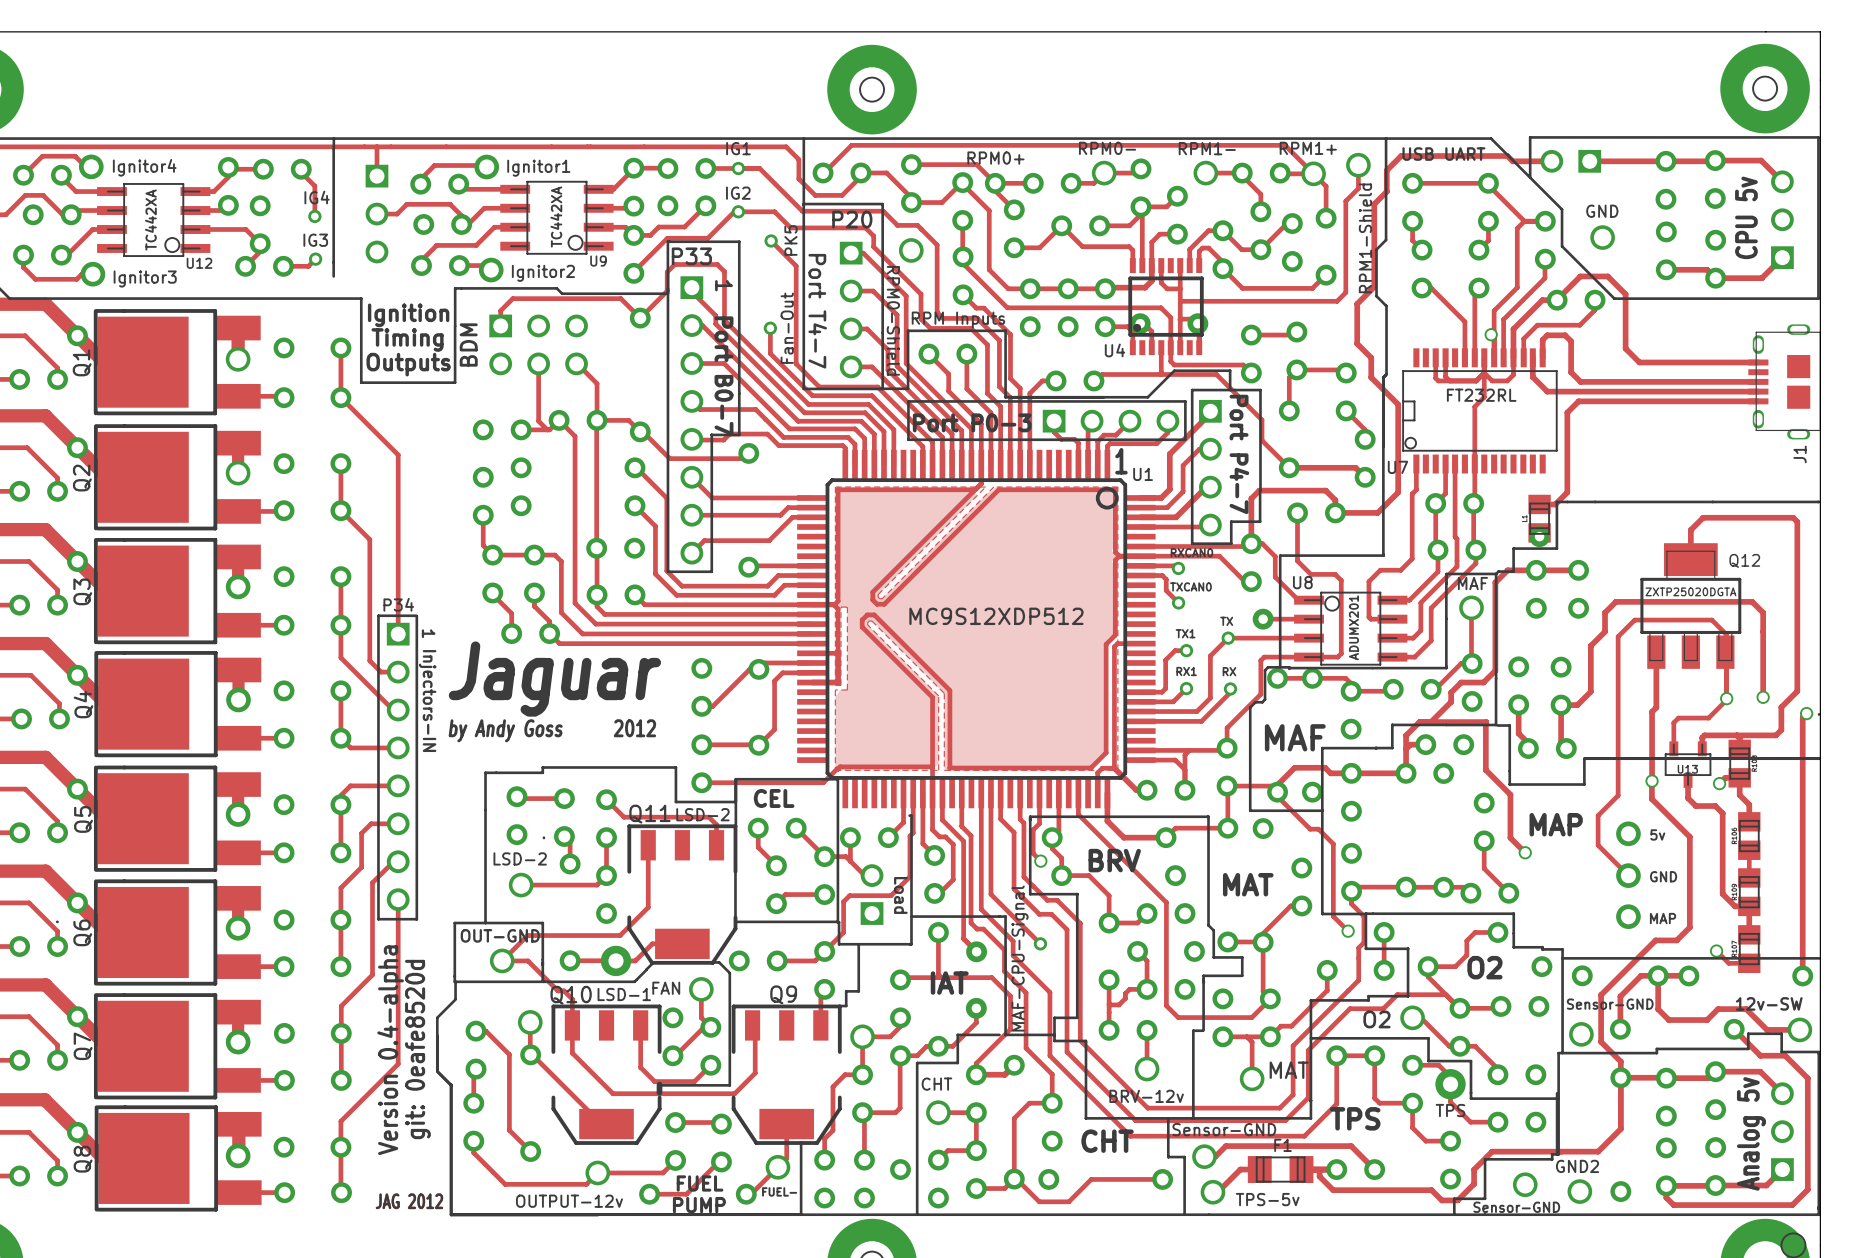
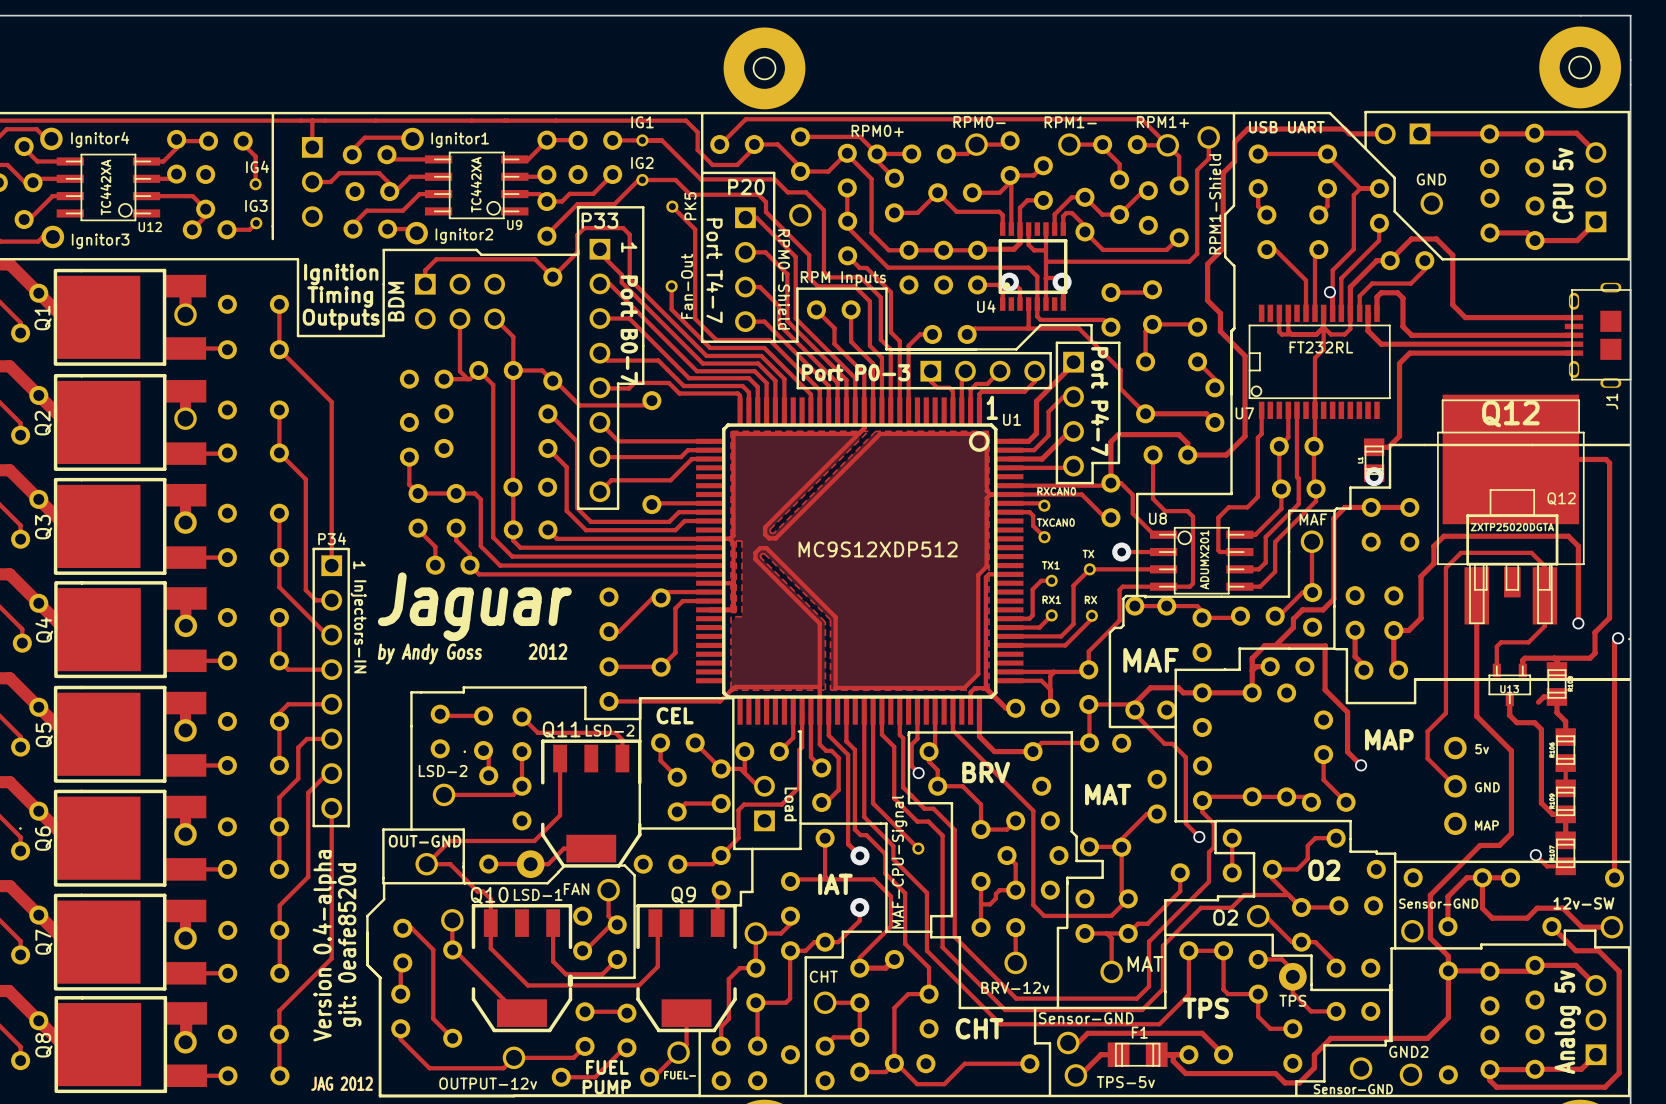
Q12: none -> (1510, 509)
track: (1656, 652) (1656, 707) (1652, 711) (1652, 781) -> (1476, 595) (1476, 700)
via: (1726, 698) -> none
via: (1652, 781) -> none
via: (1719, 783) -> none

